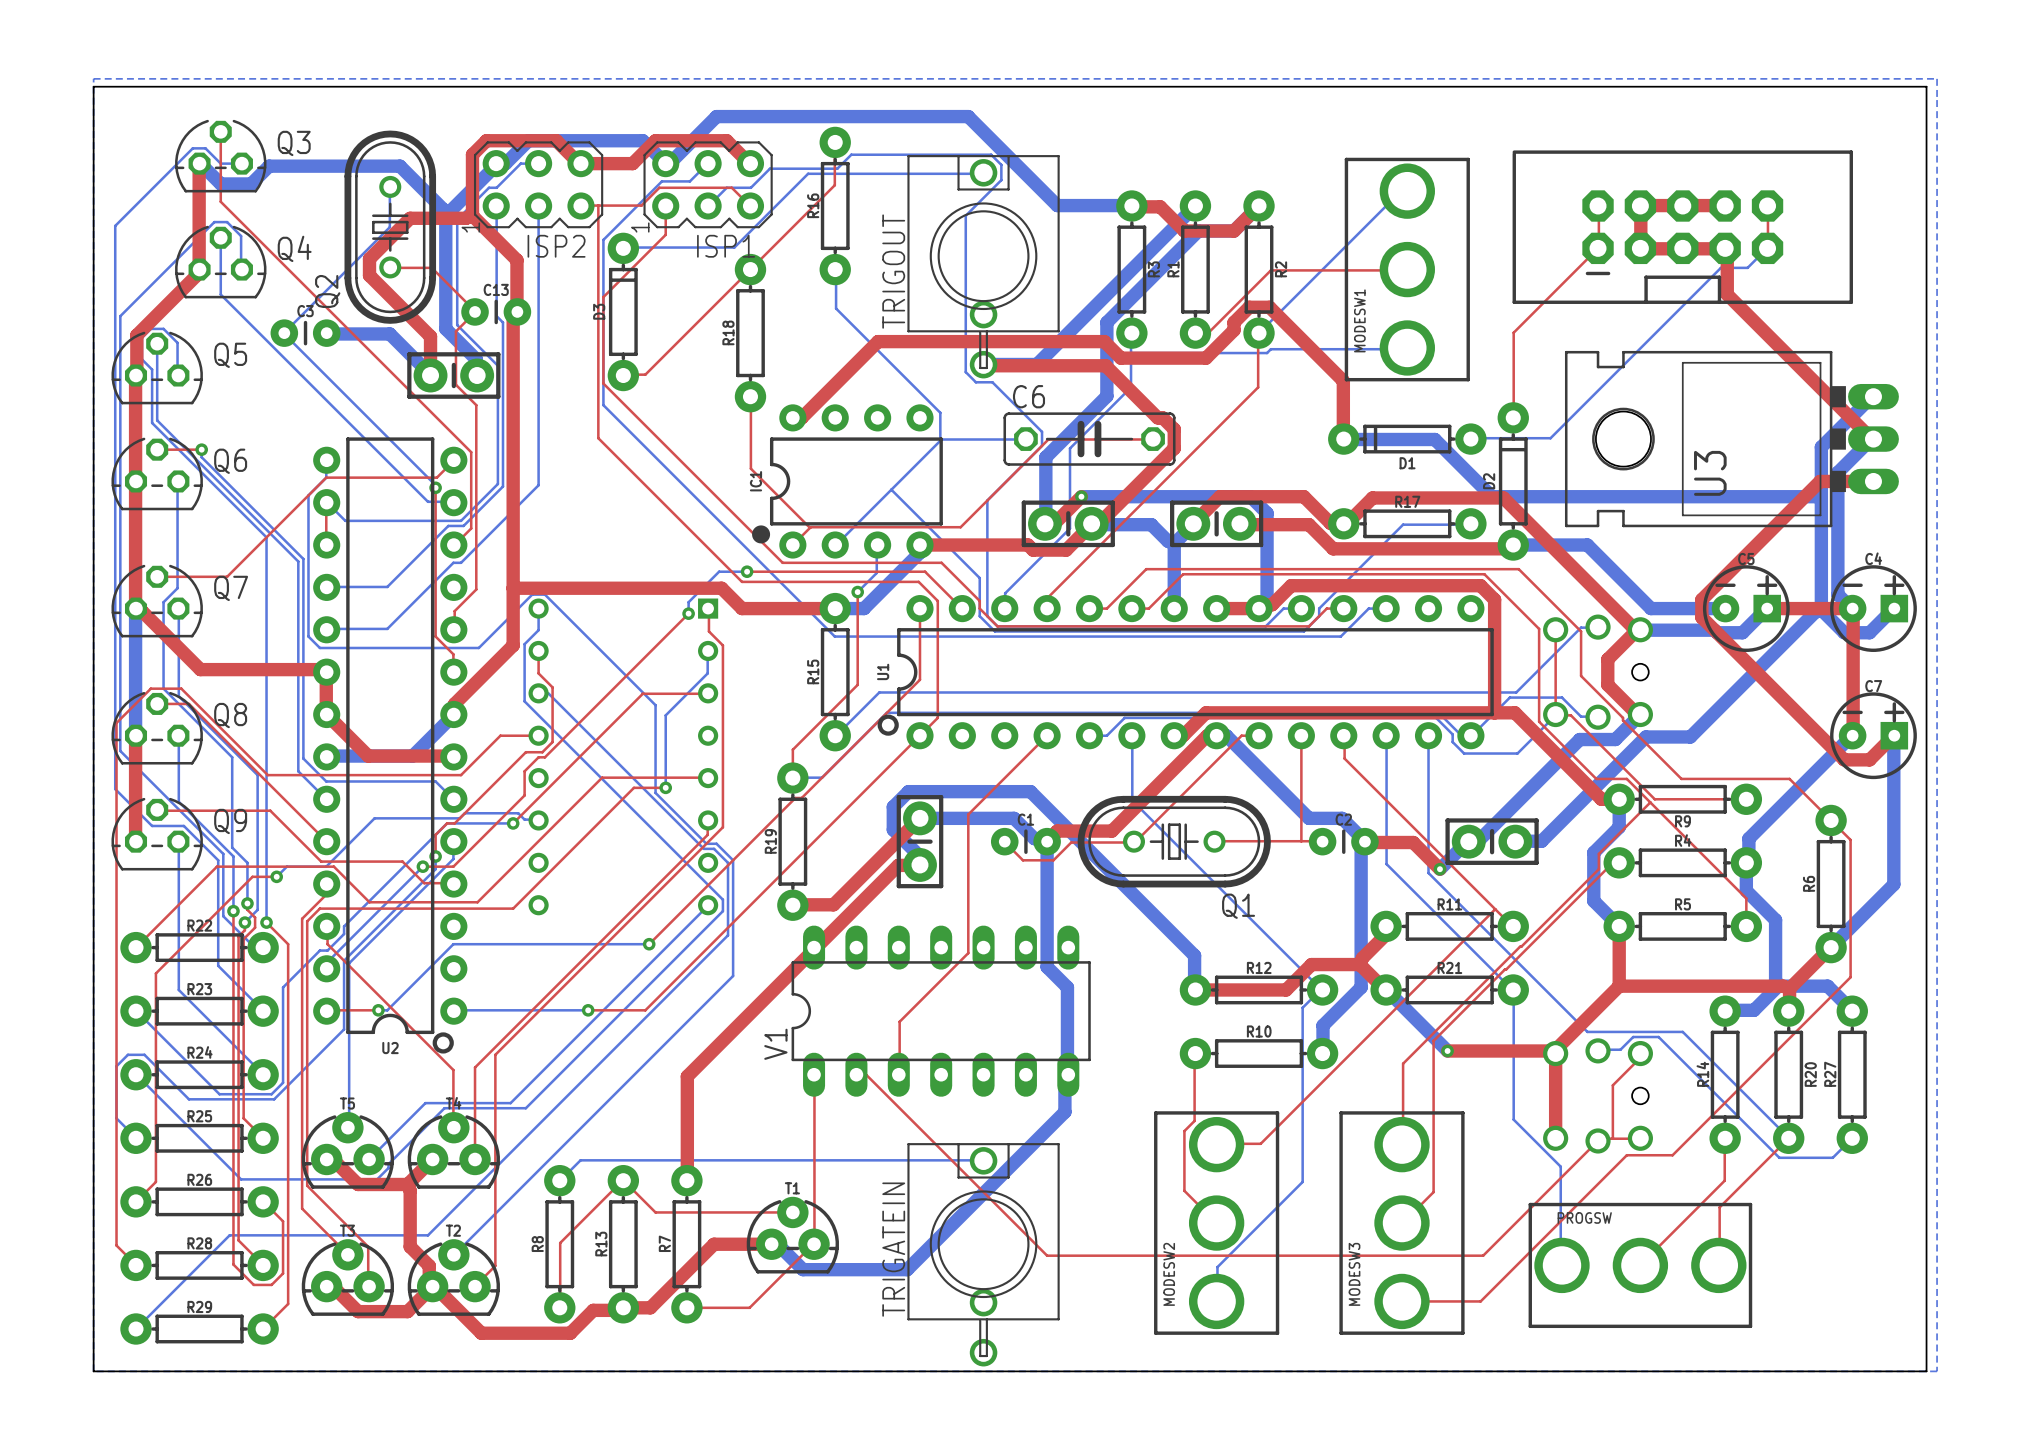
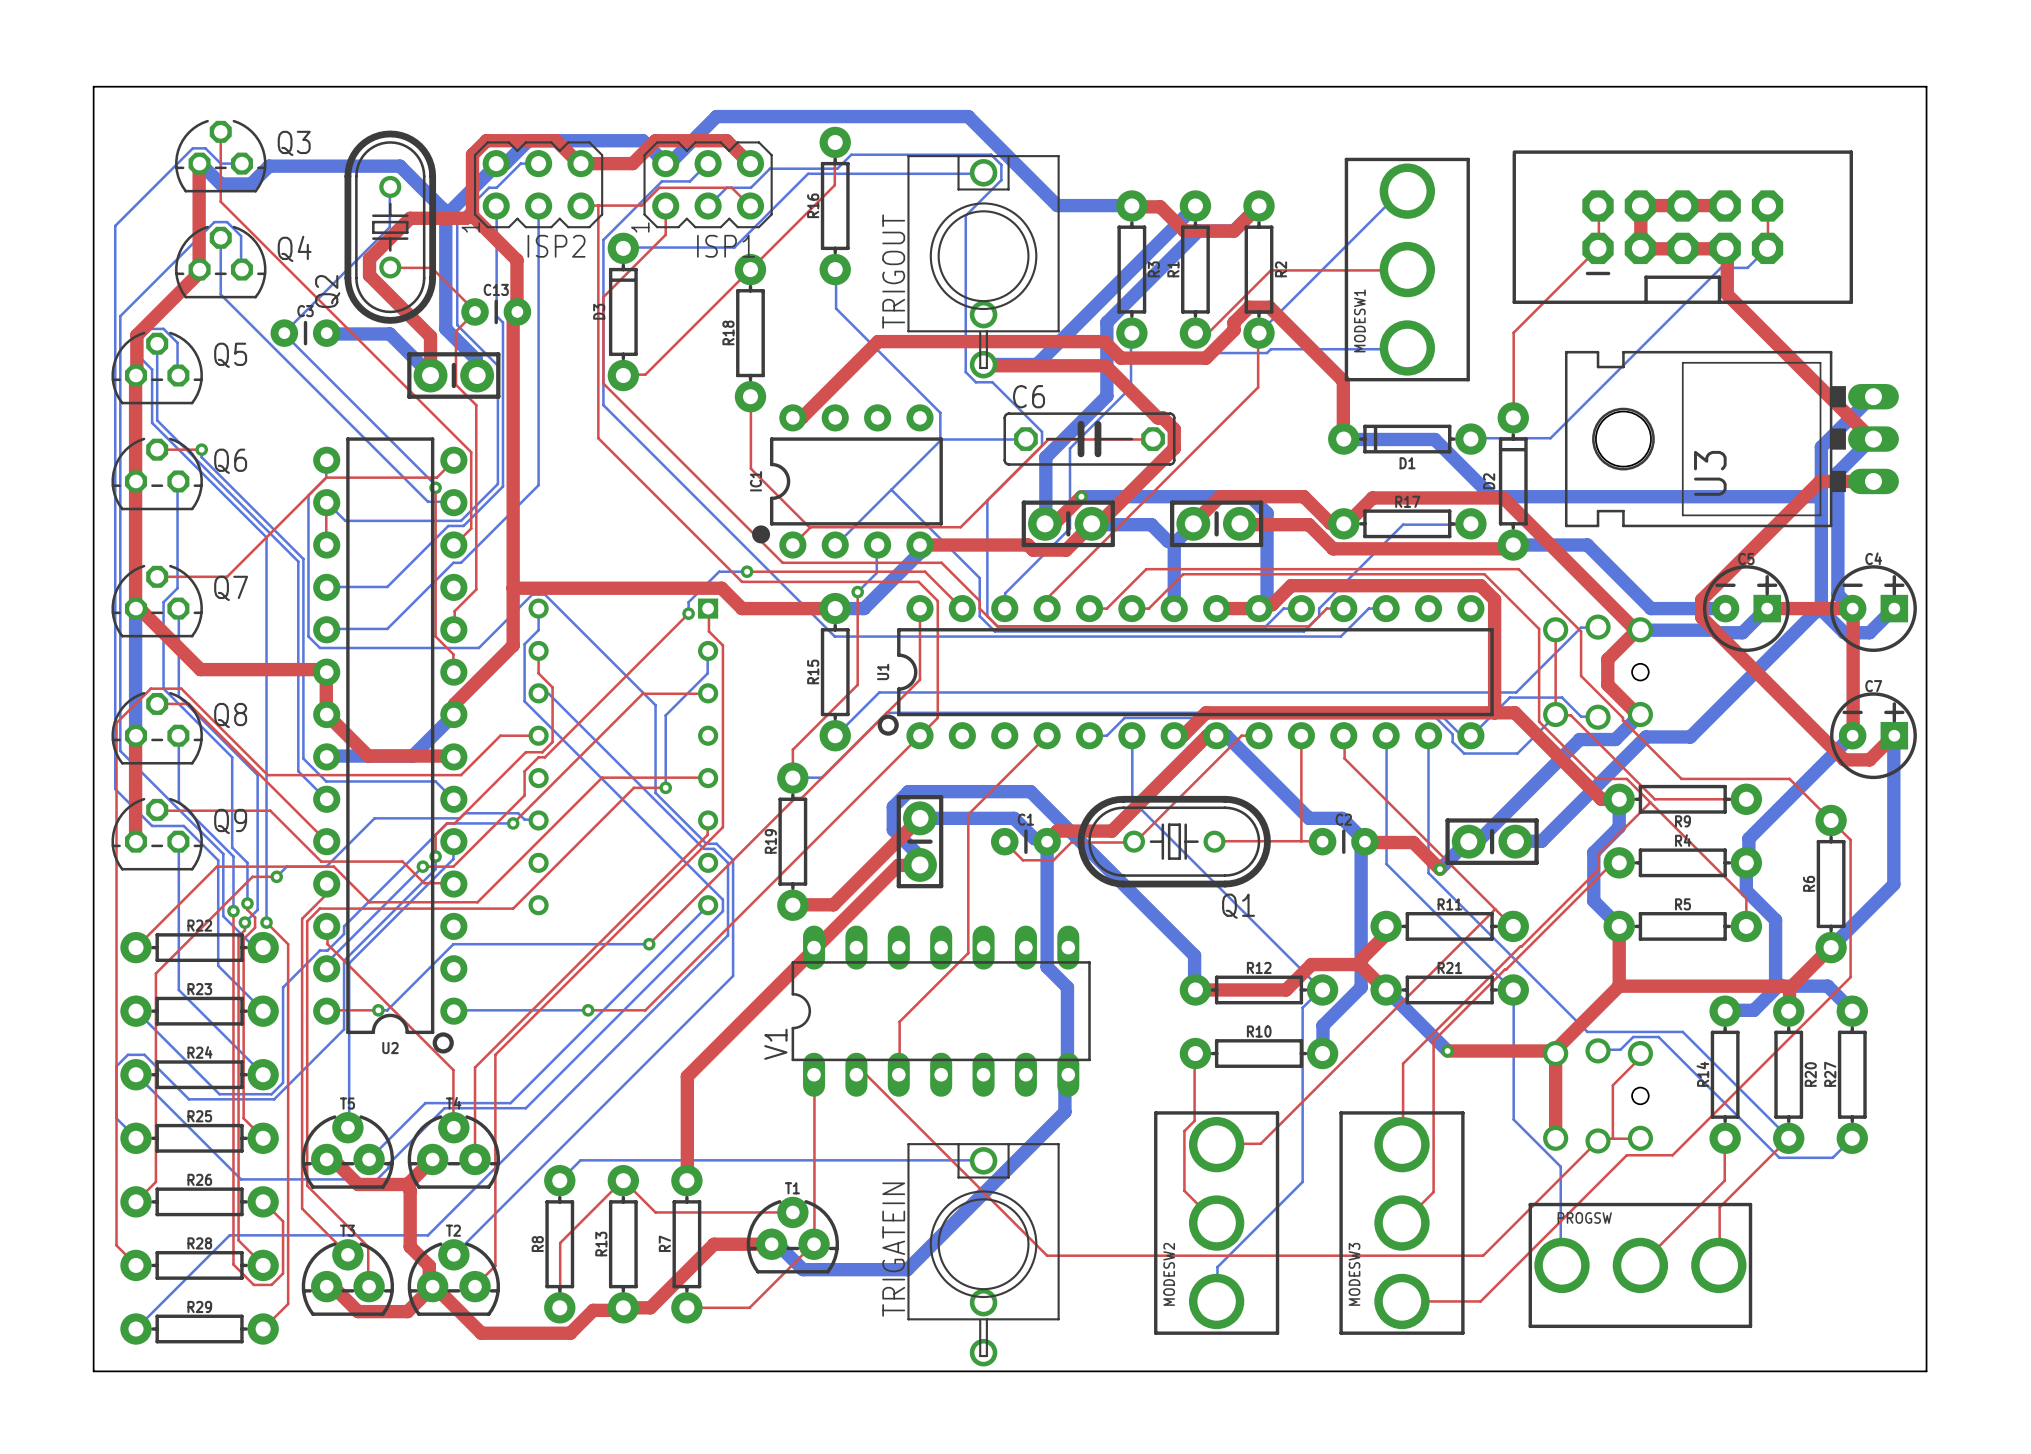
bottom zone outline: (93, 78) (1937, 78) (1937, 1371) (93, 1371) (93, 78) -> none

